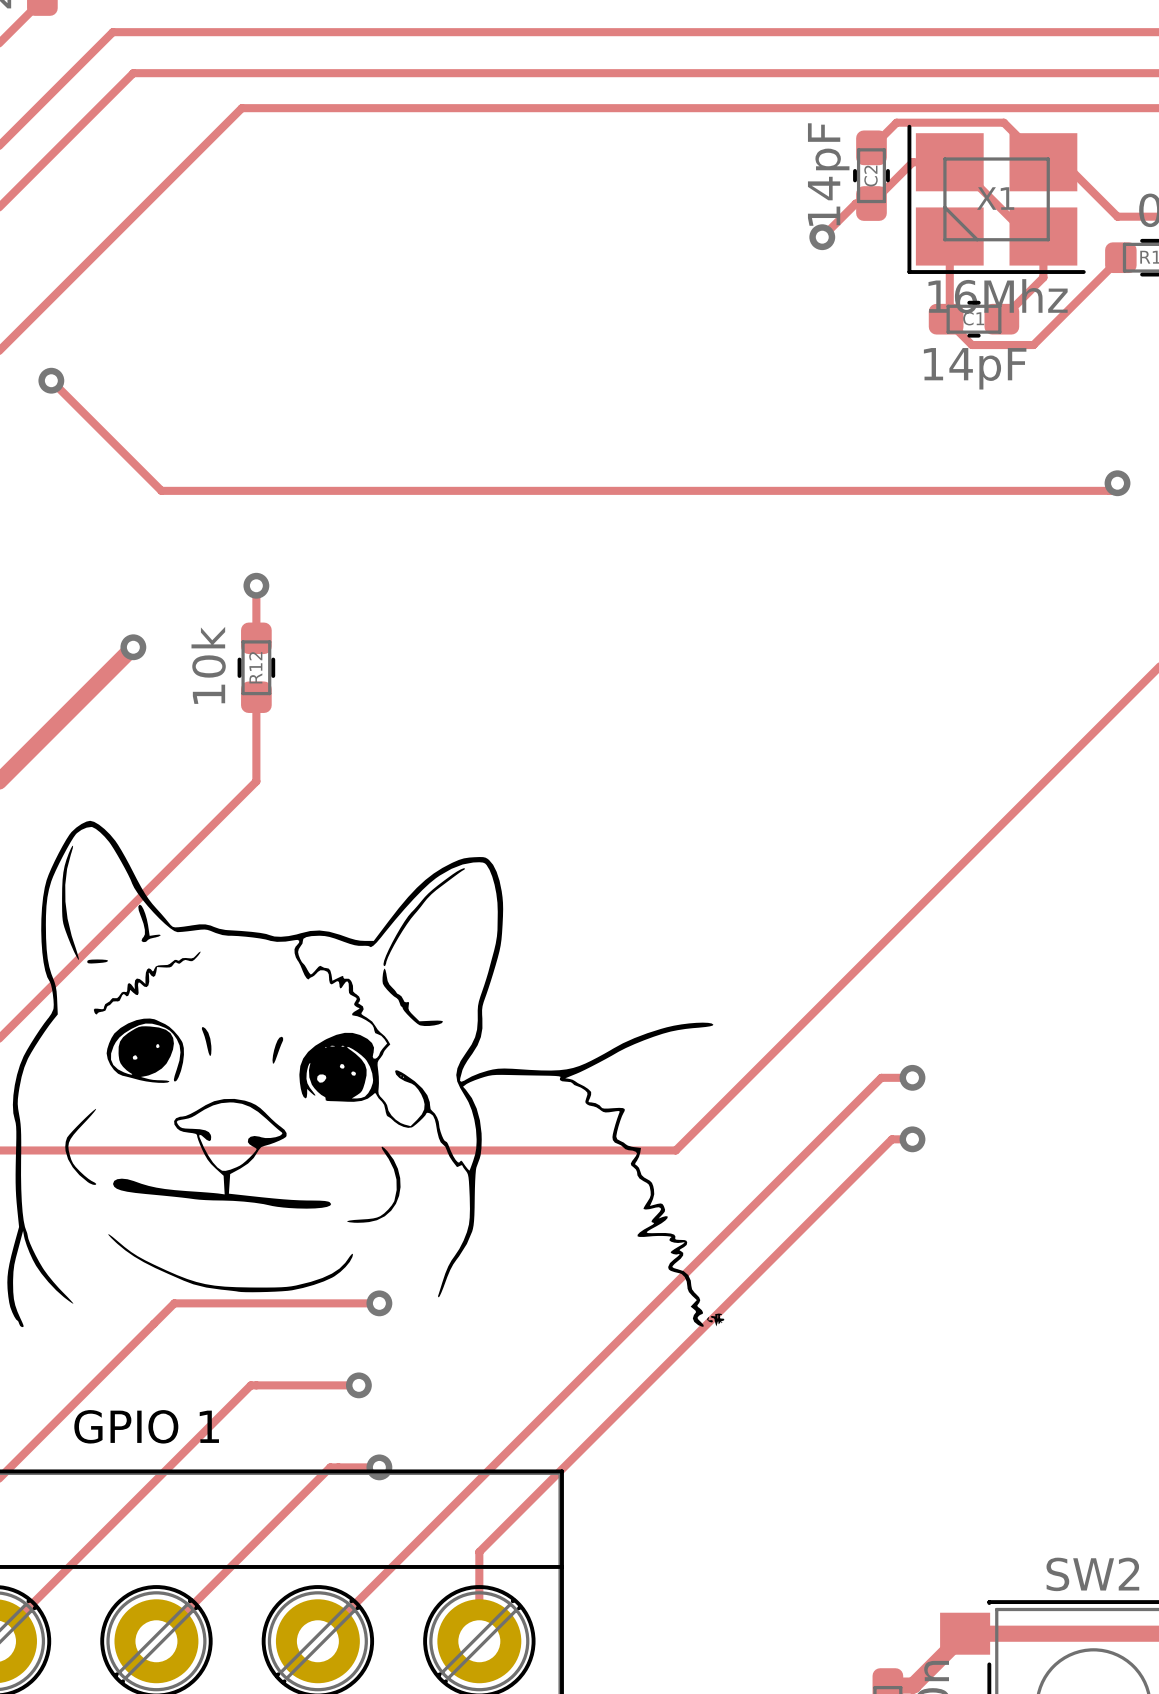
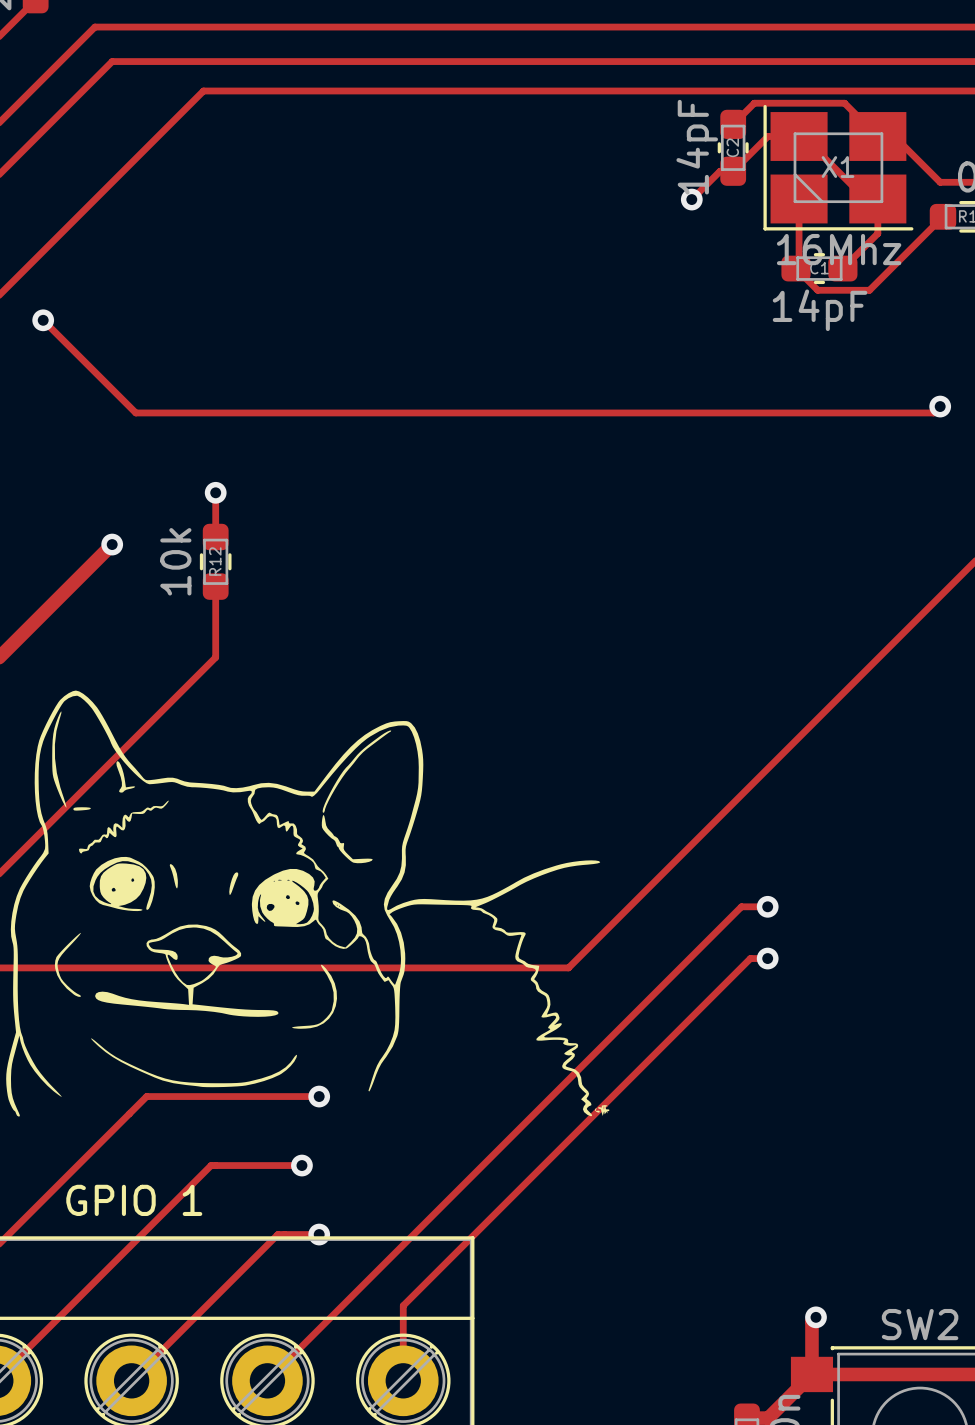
track: none -> (815, 1317) (811, 1321) (811, 1374)
via: none -> (815, 1317)

